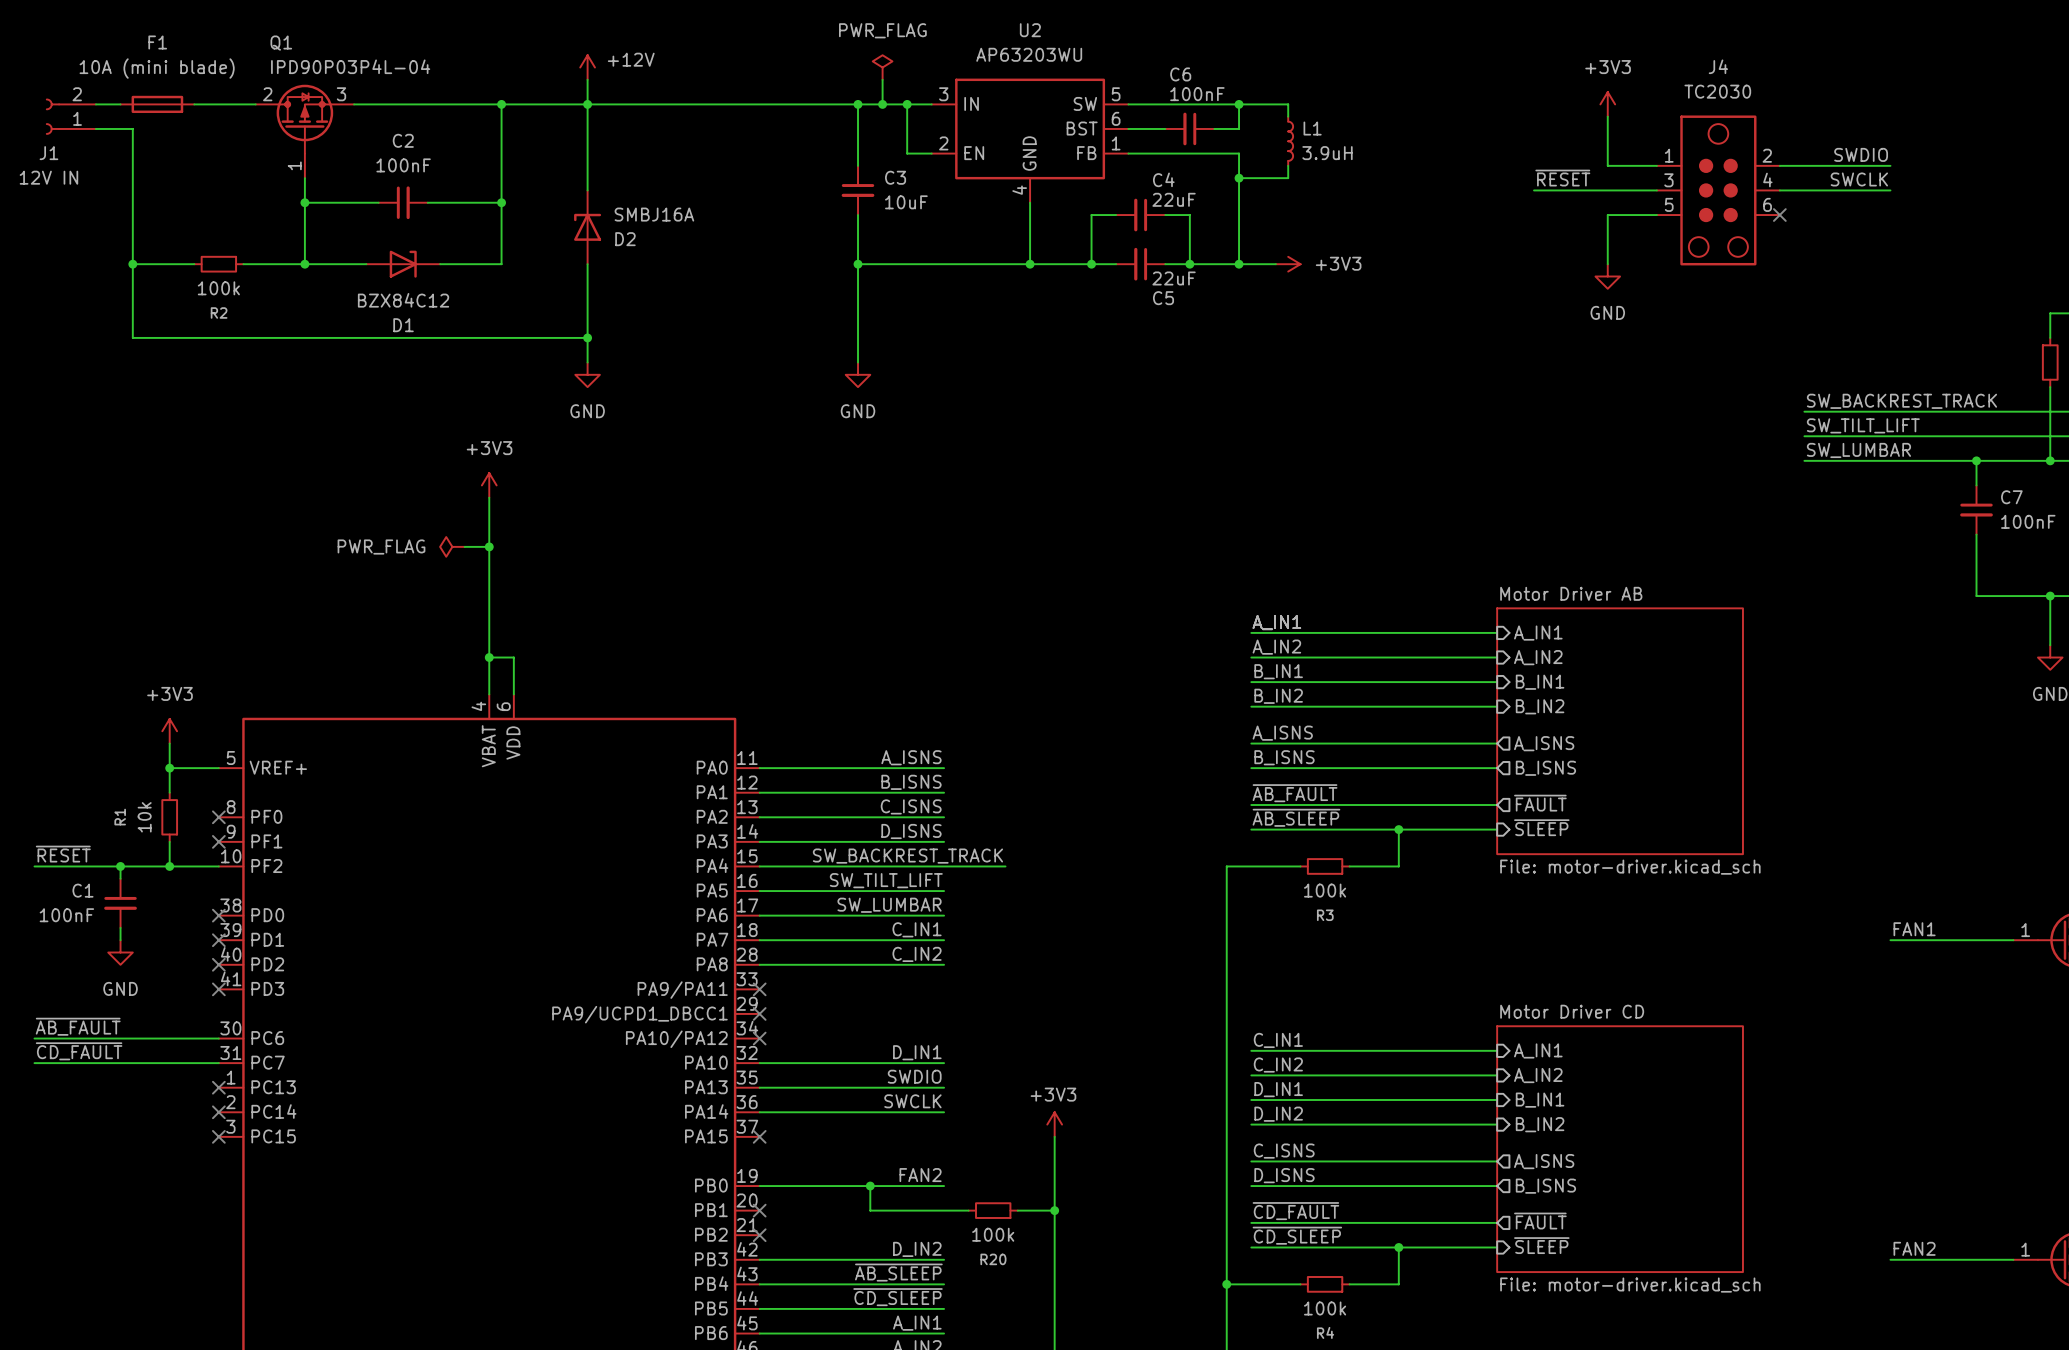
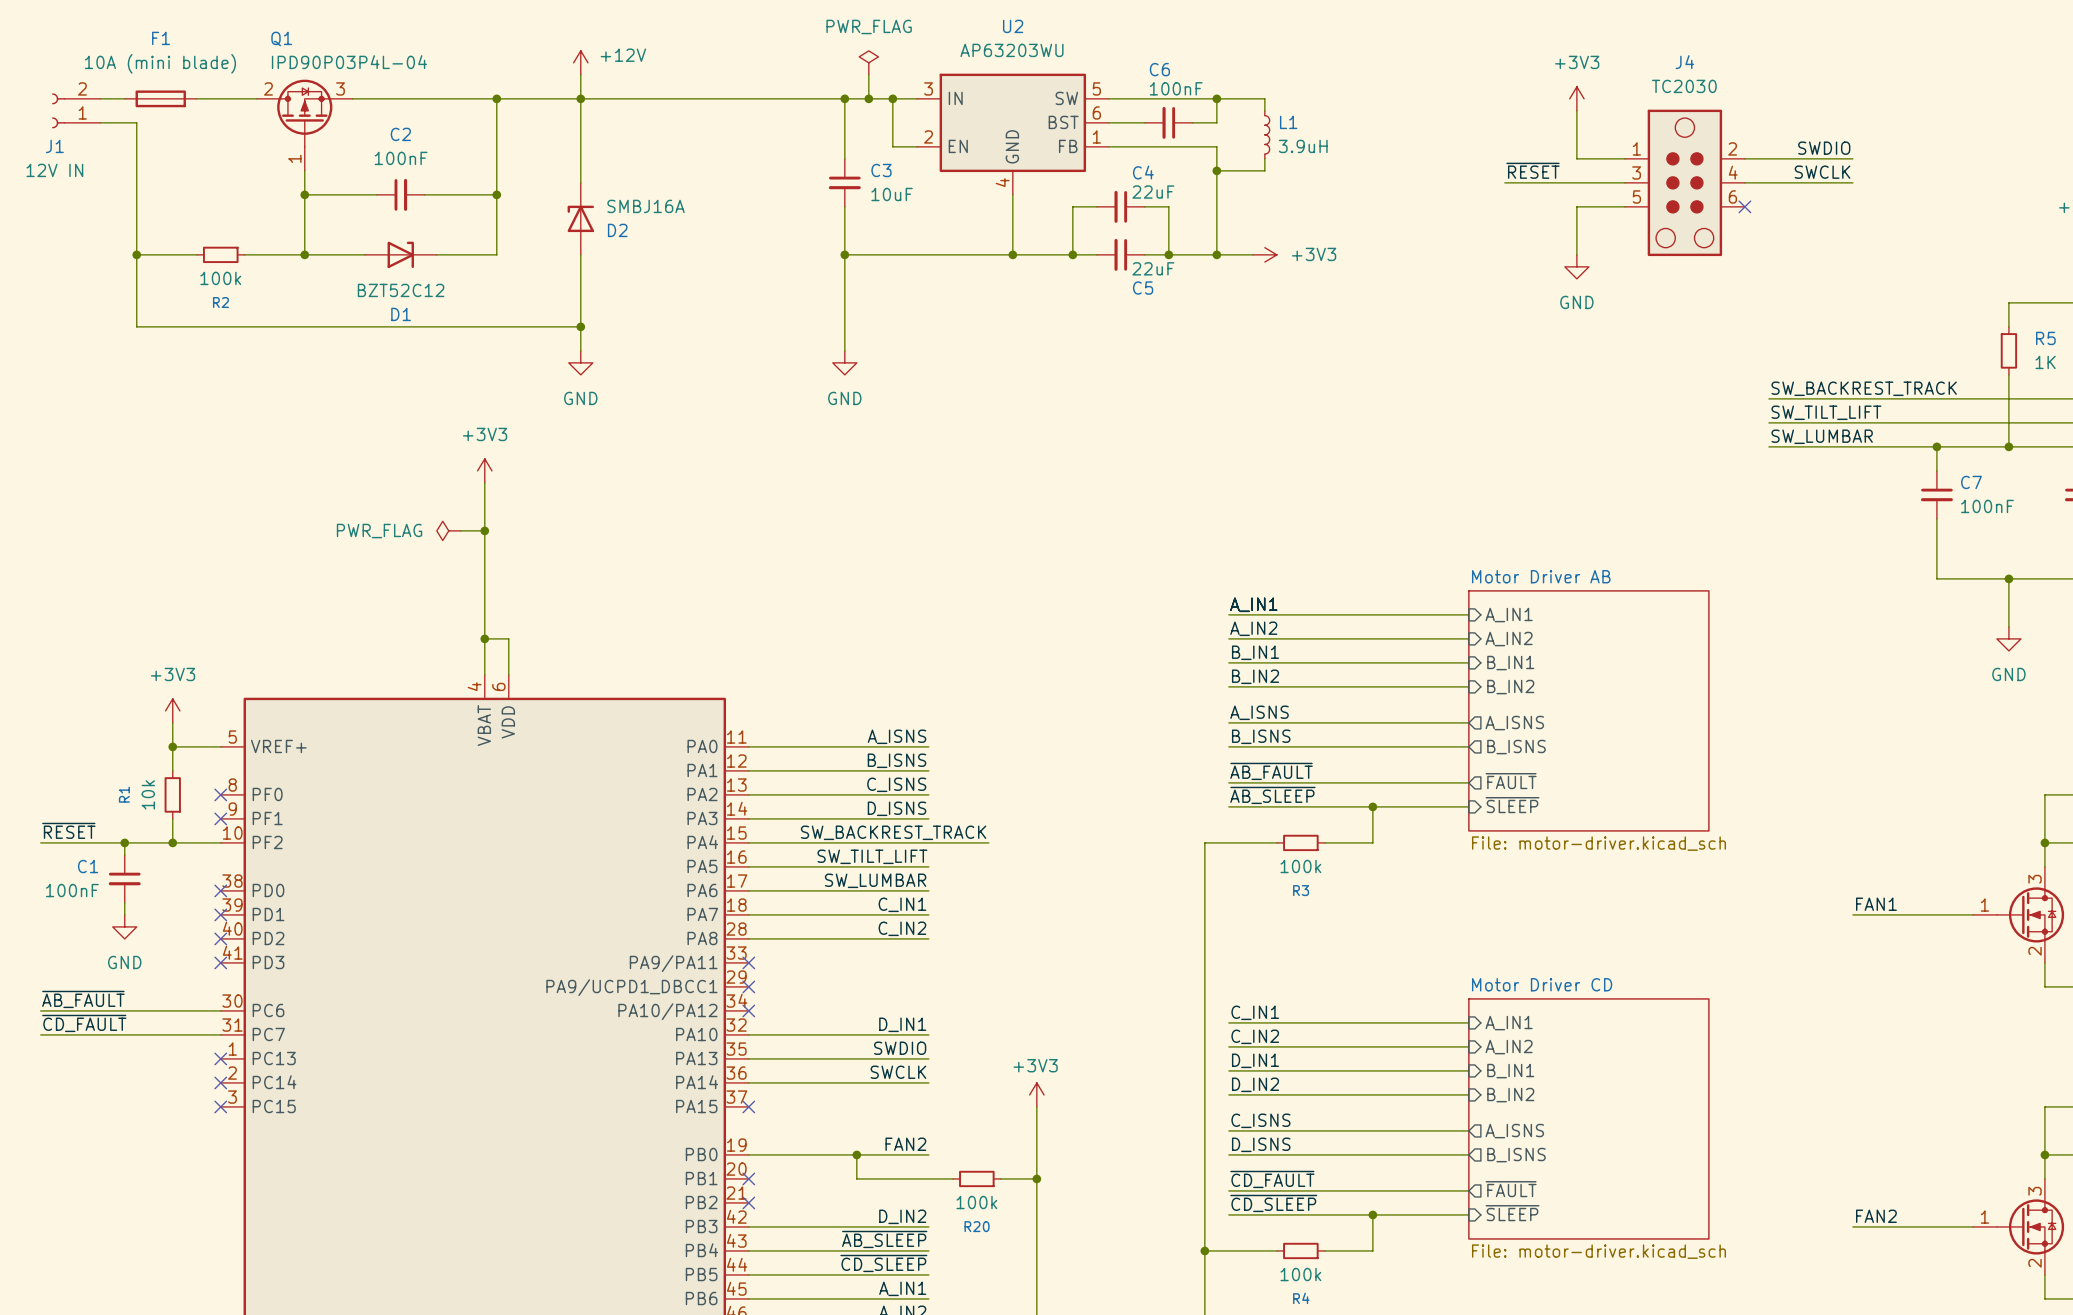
D1 value: BZX84C12 (403, 300) -> BZT52C12 (401, 290)

